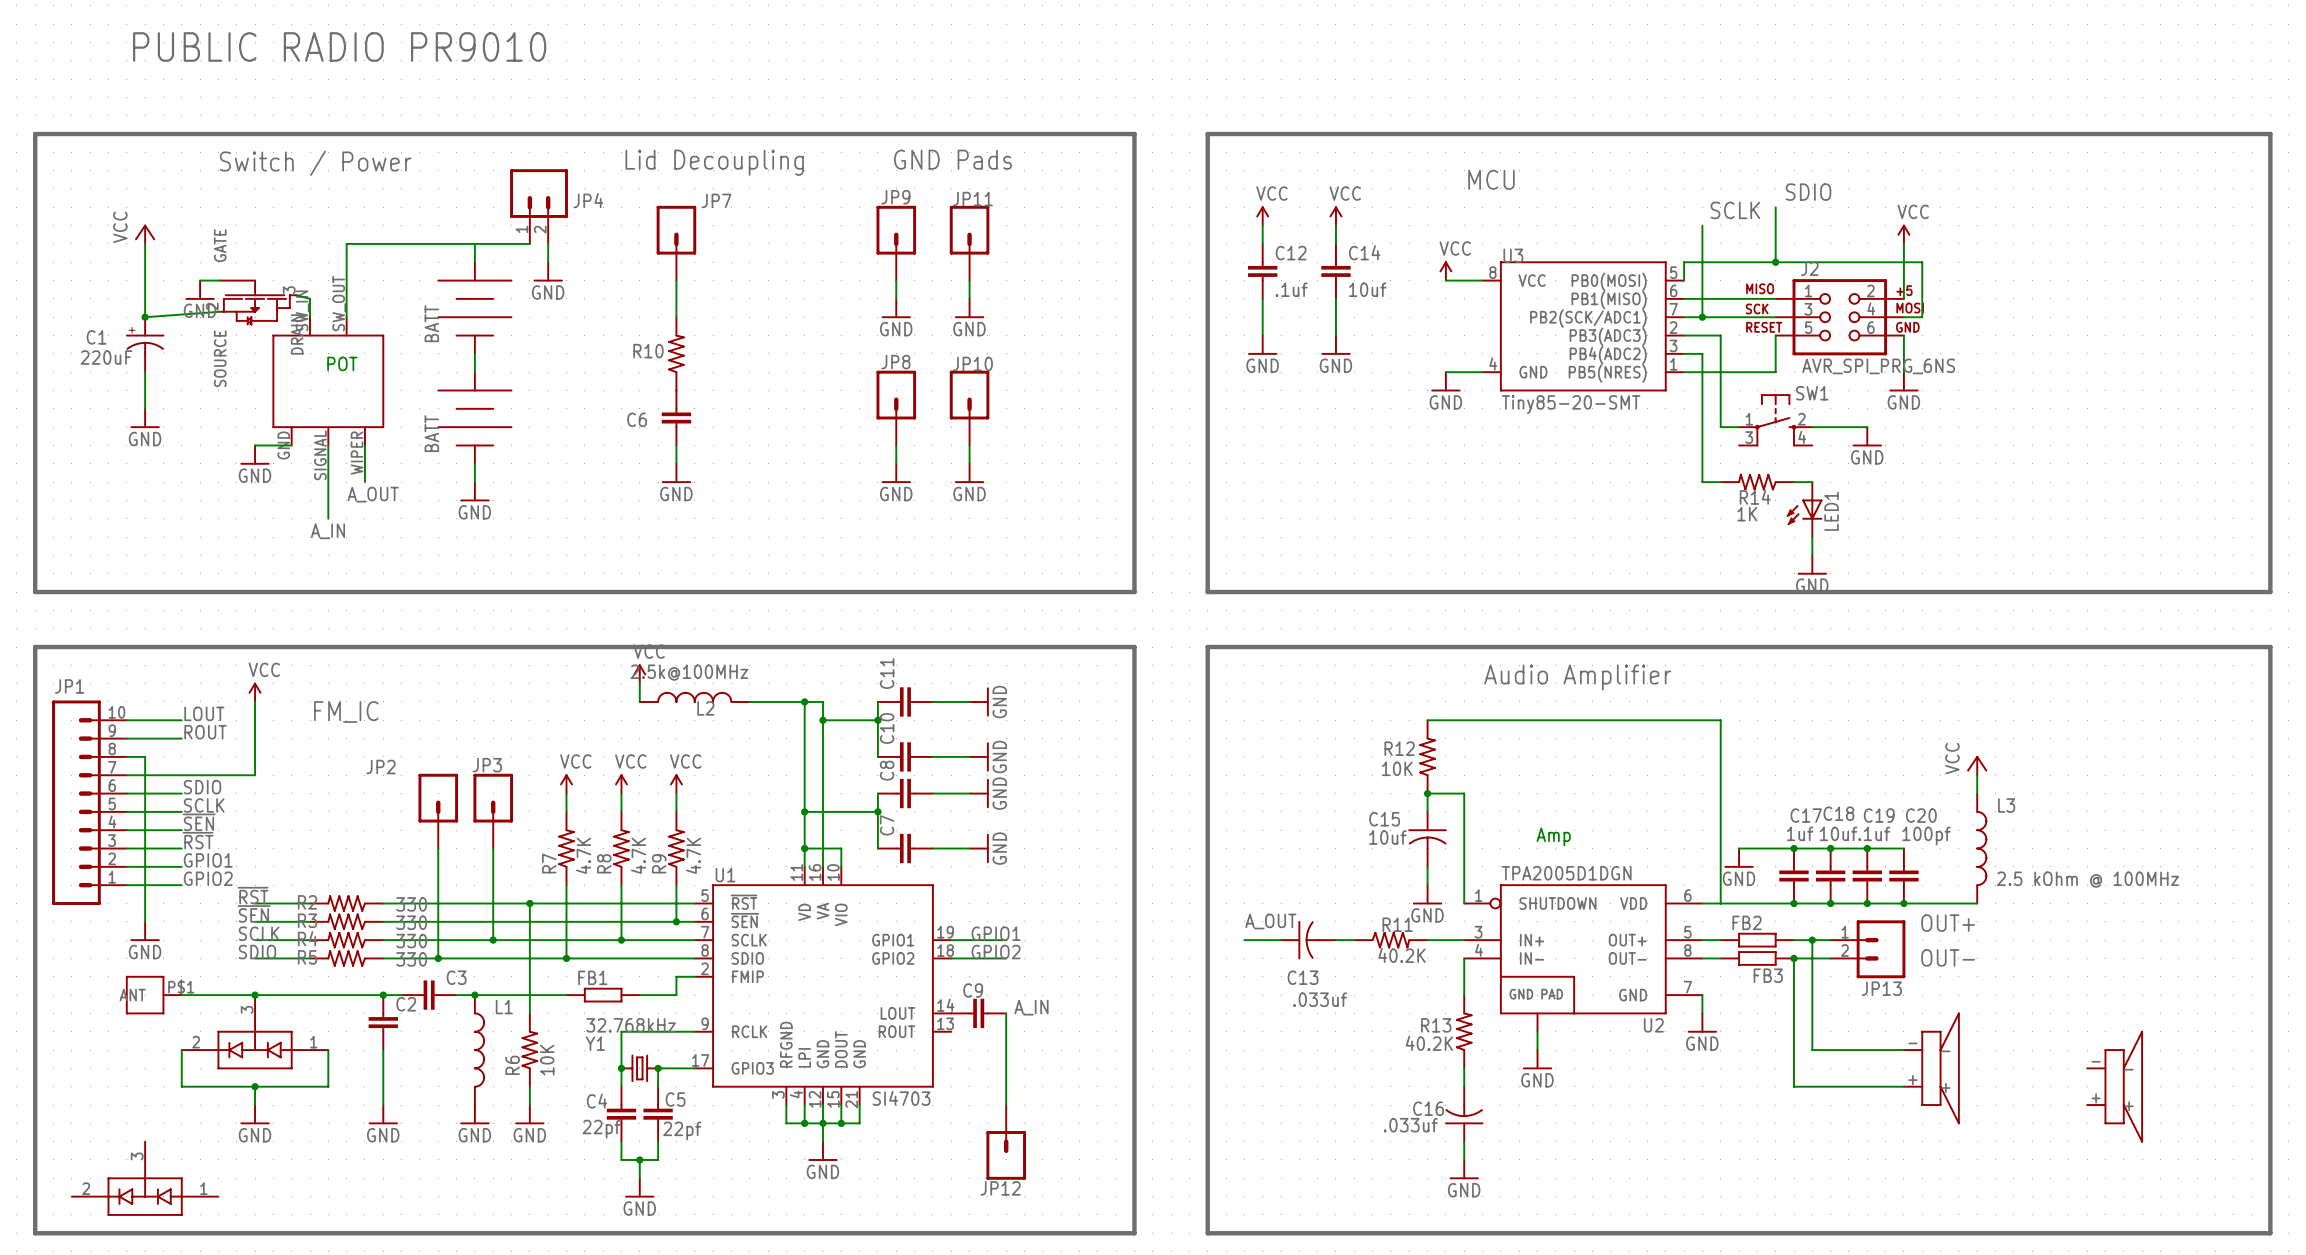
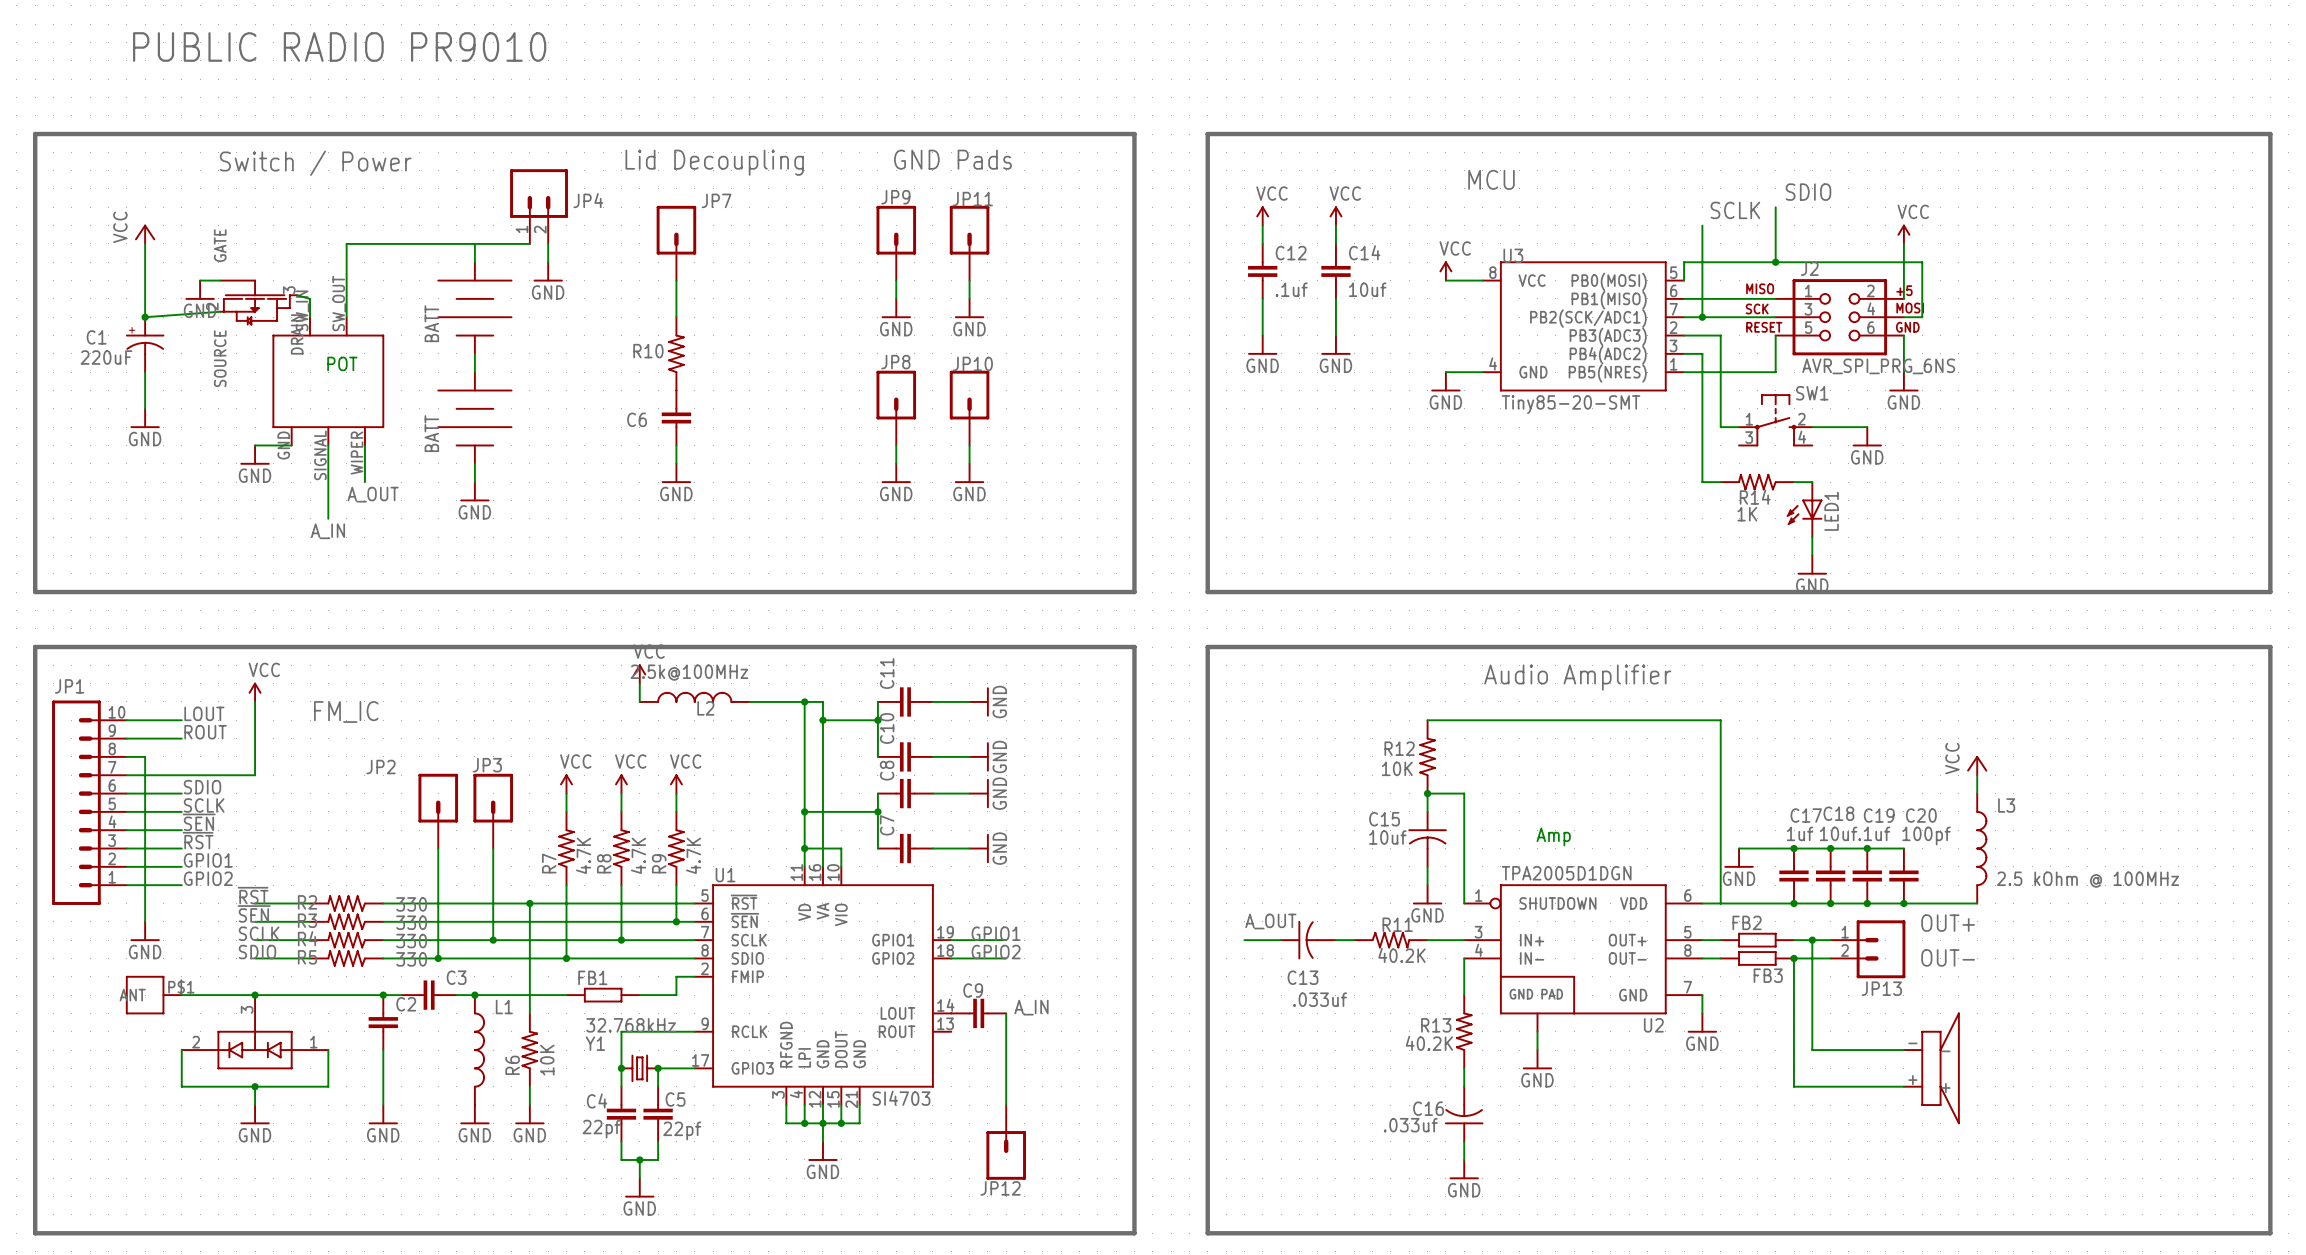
part: (2115, 1086) -> none
part: (145, 1178) -> none

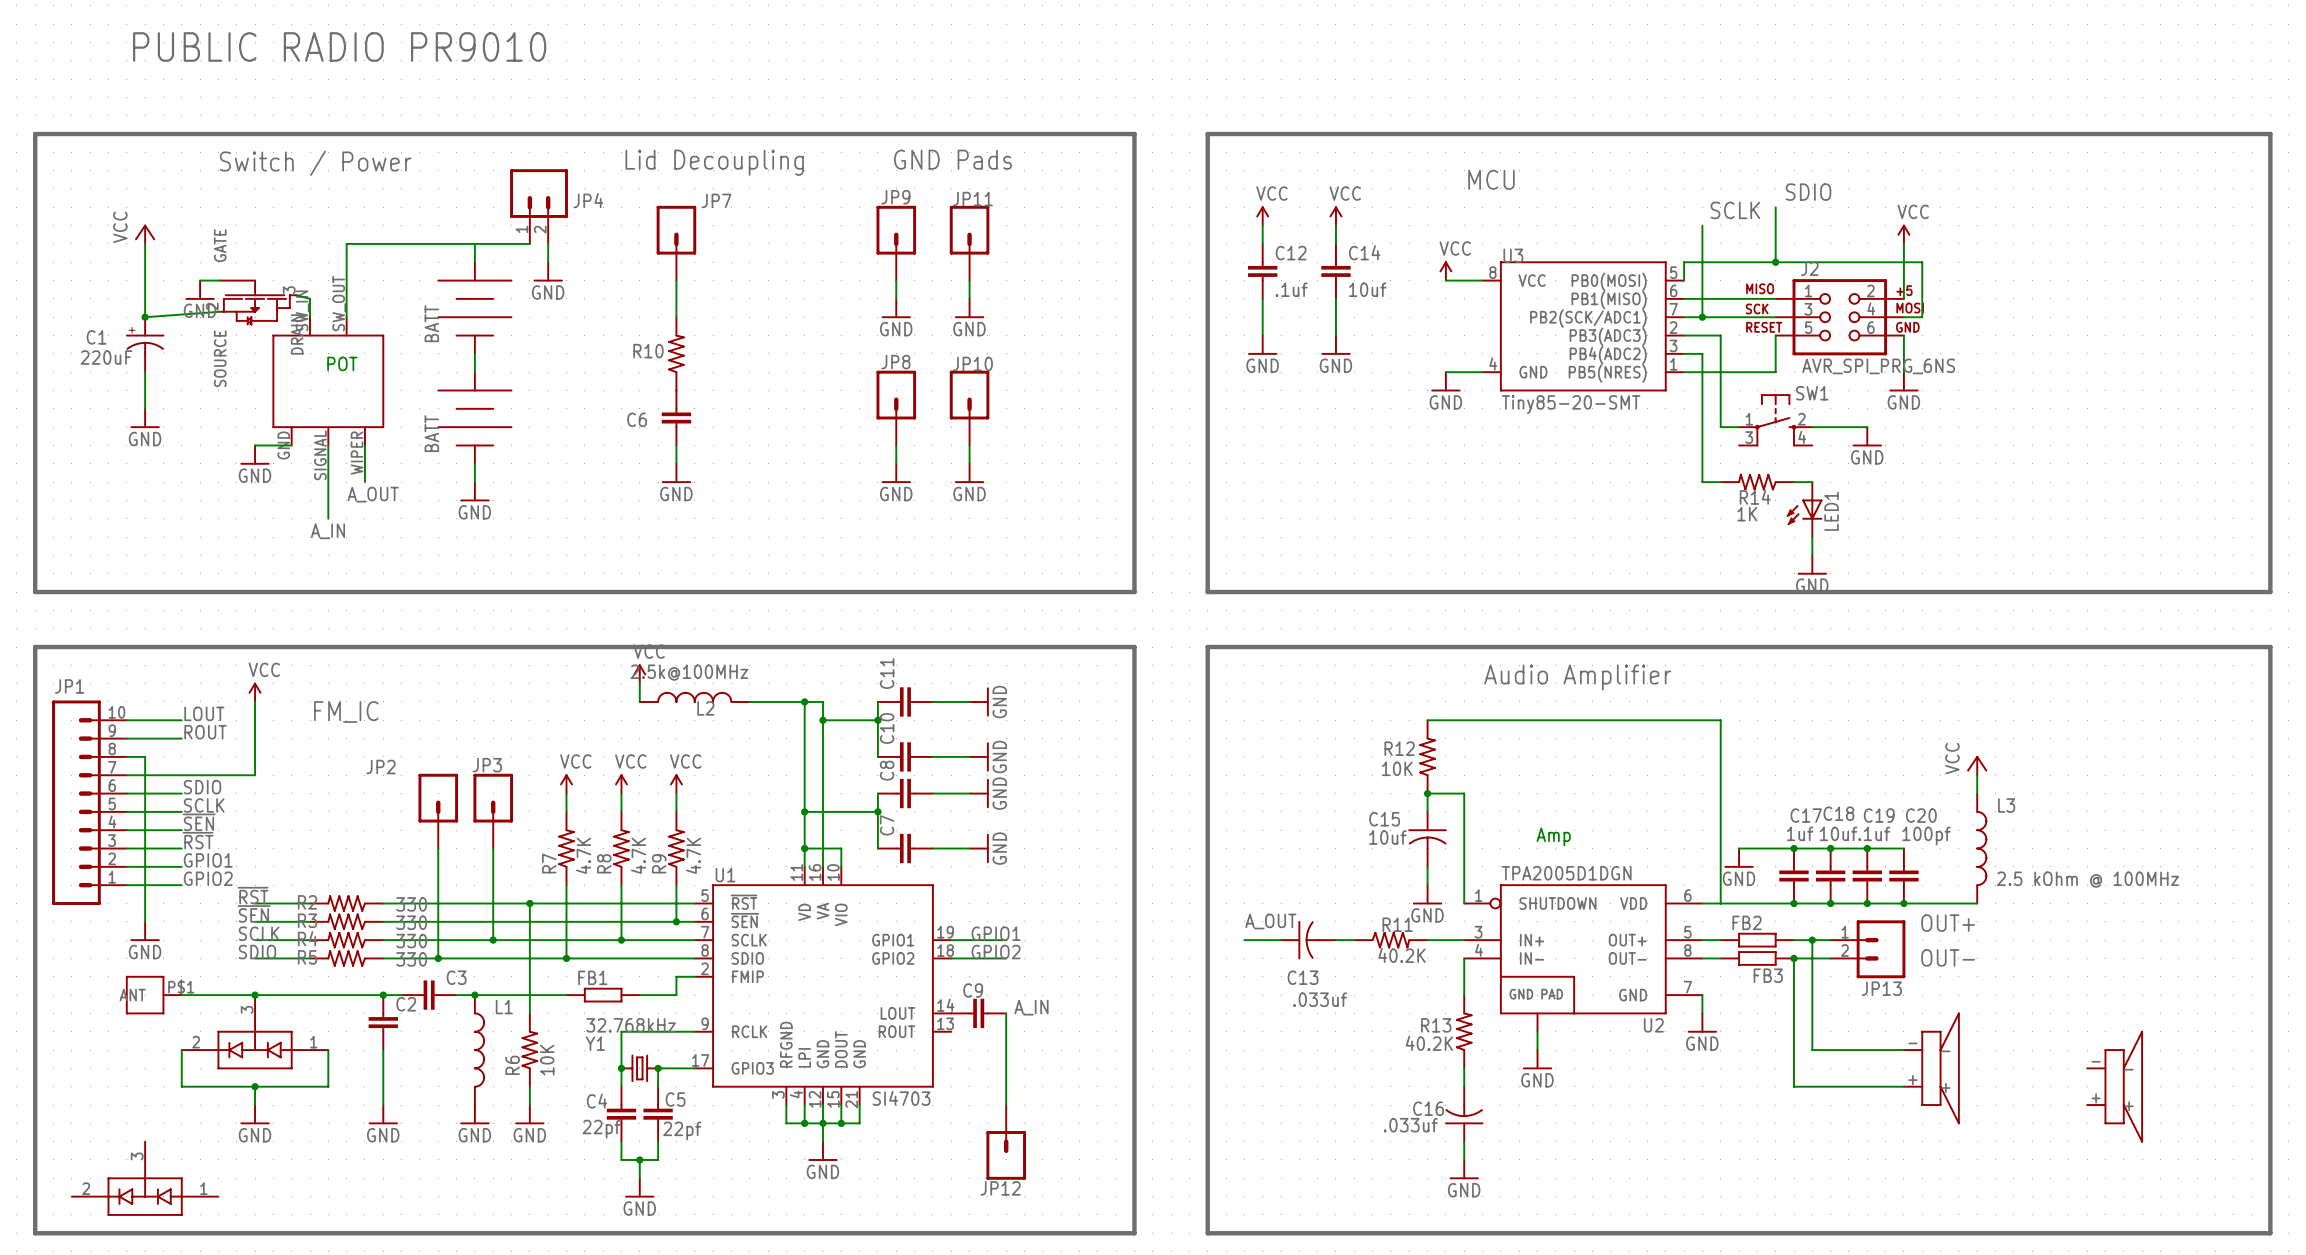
part: none -> (2115, 1086)
part: none -> (145, 1178)

